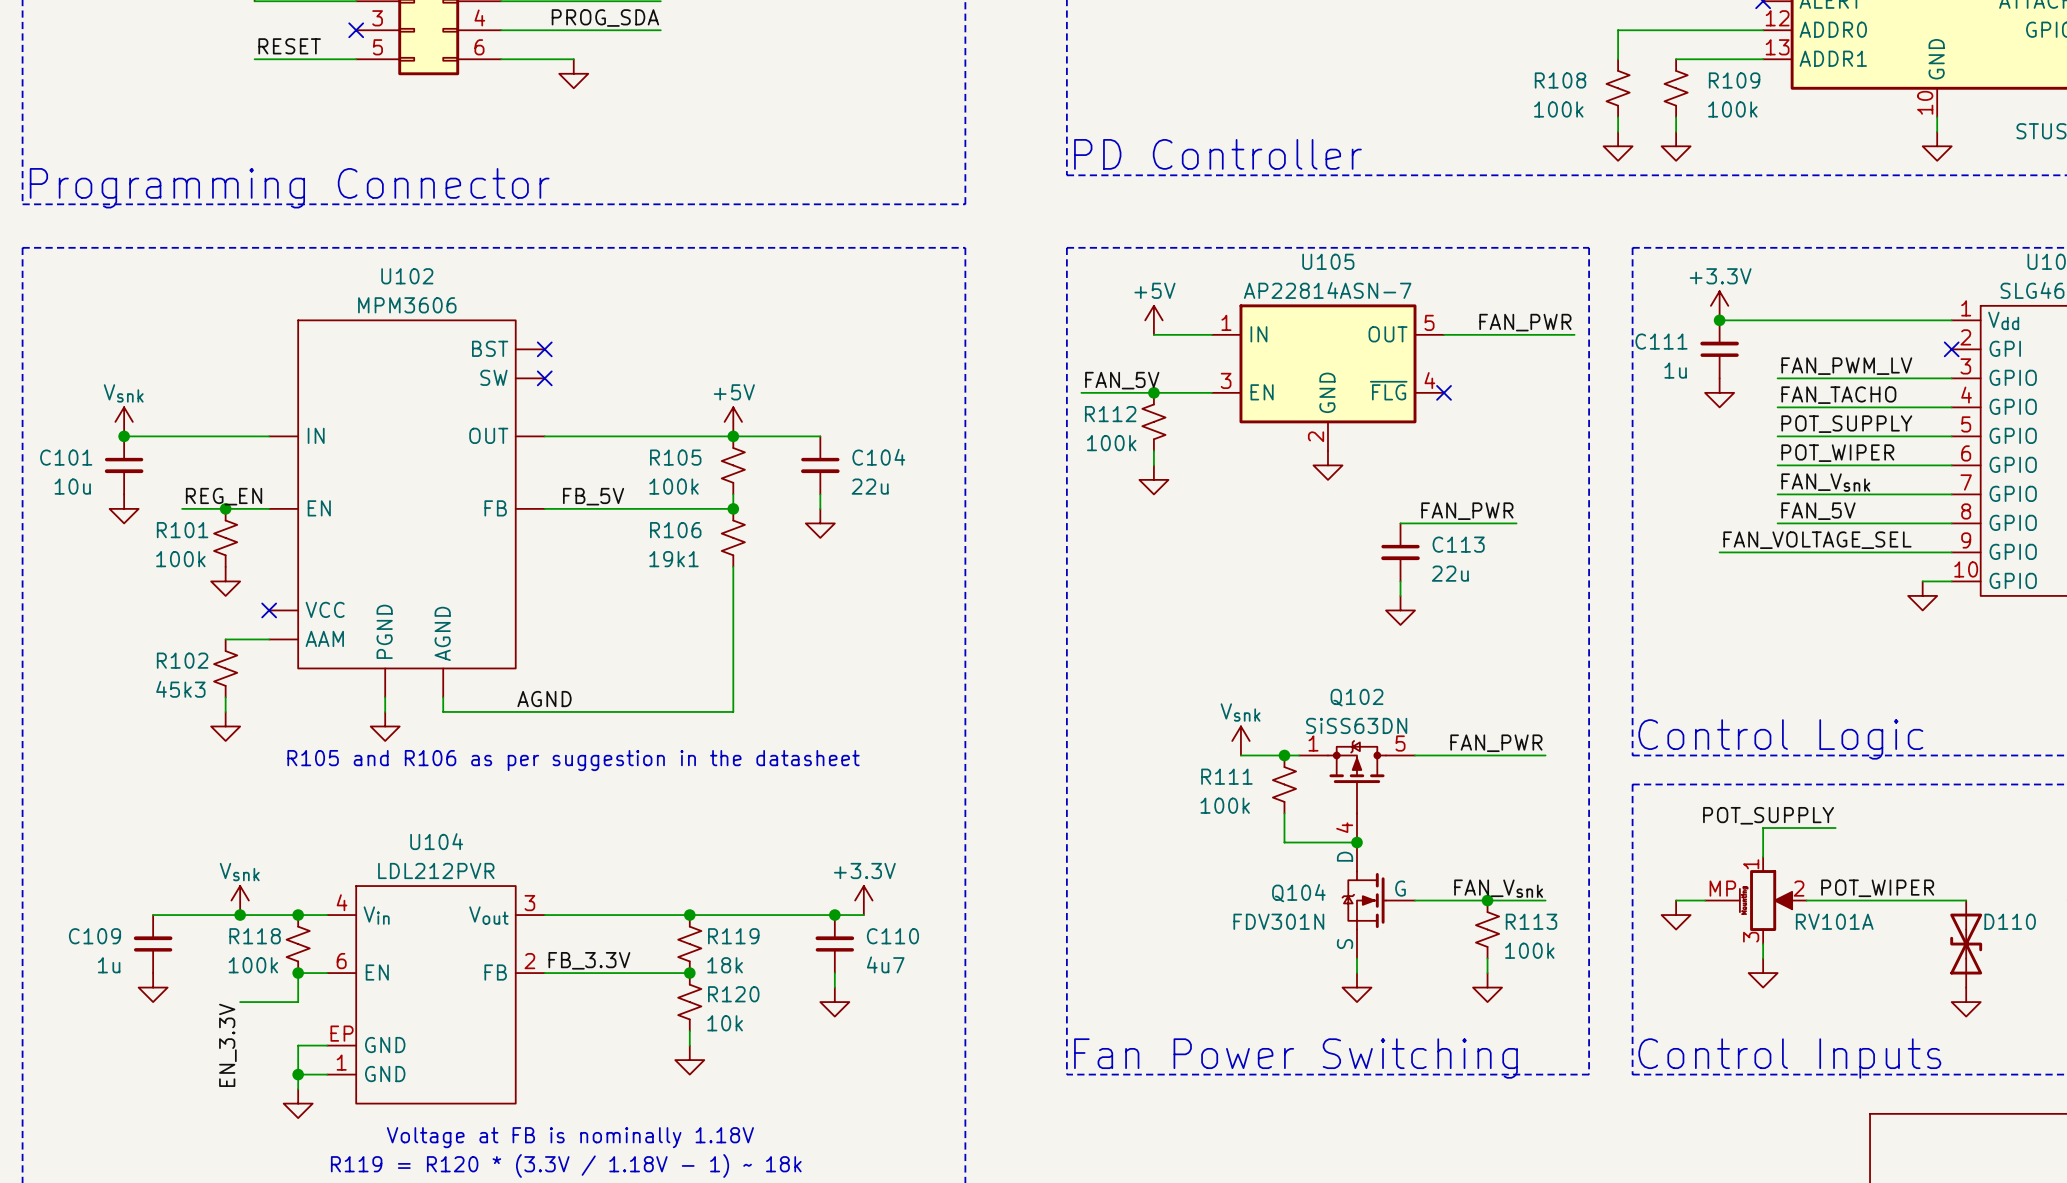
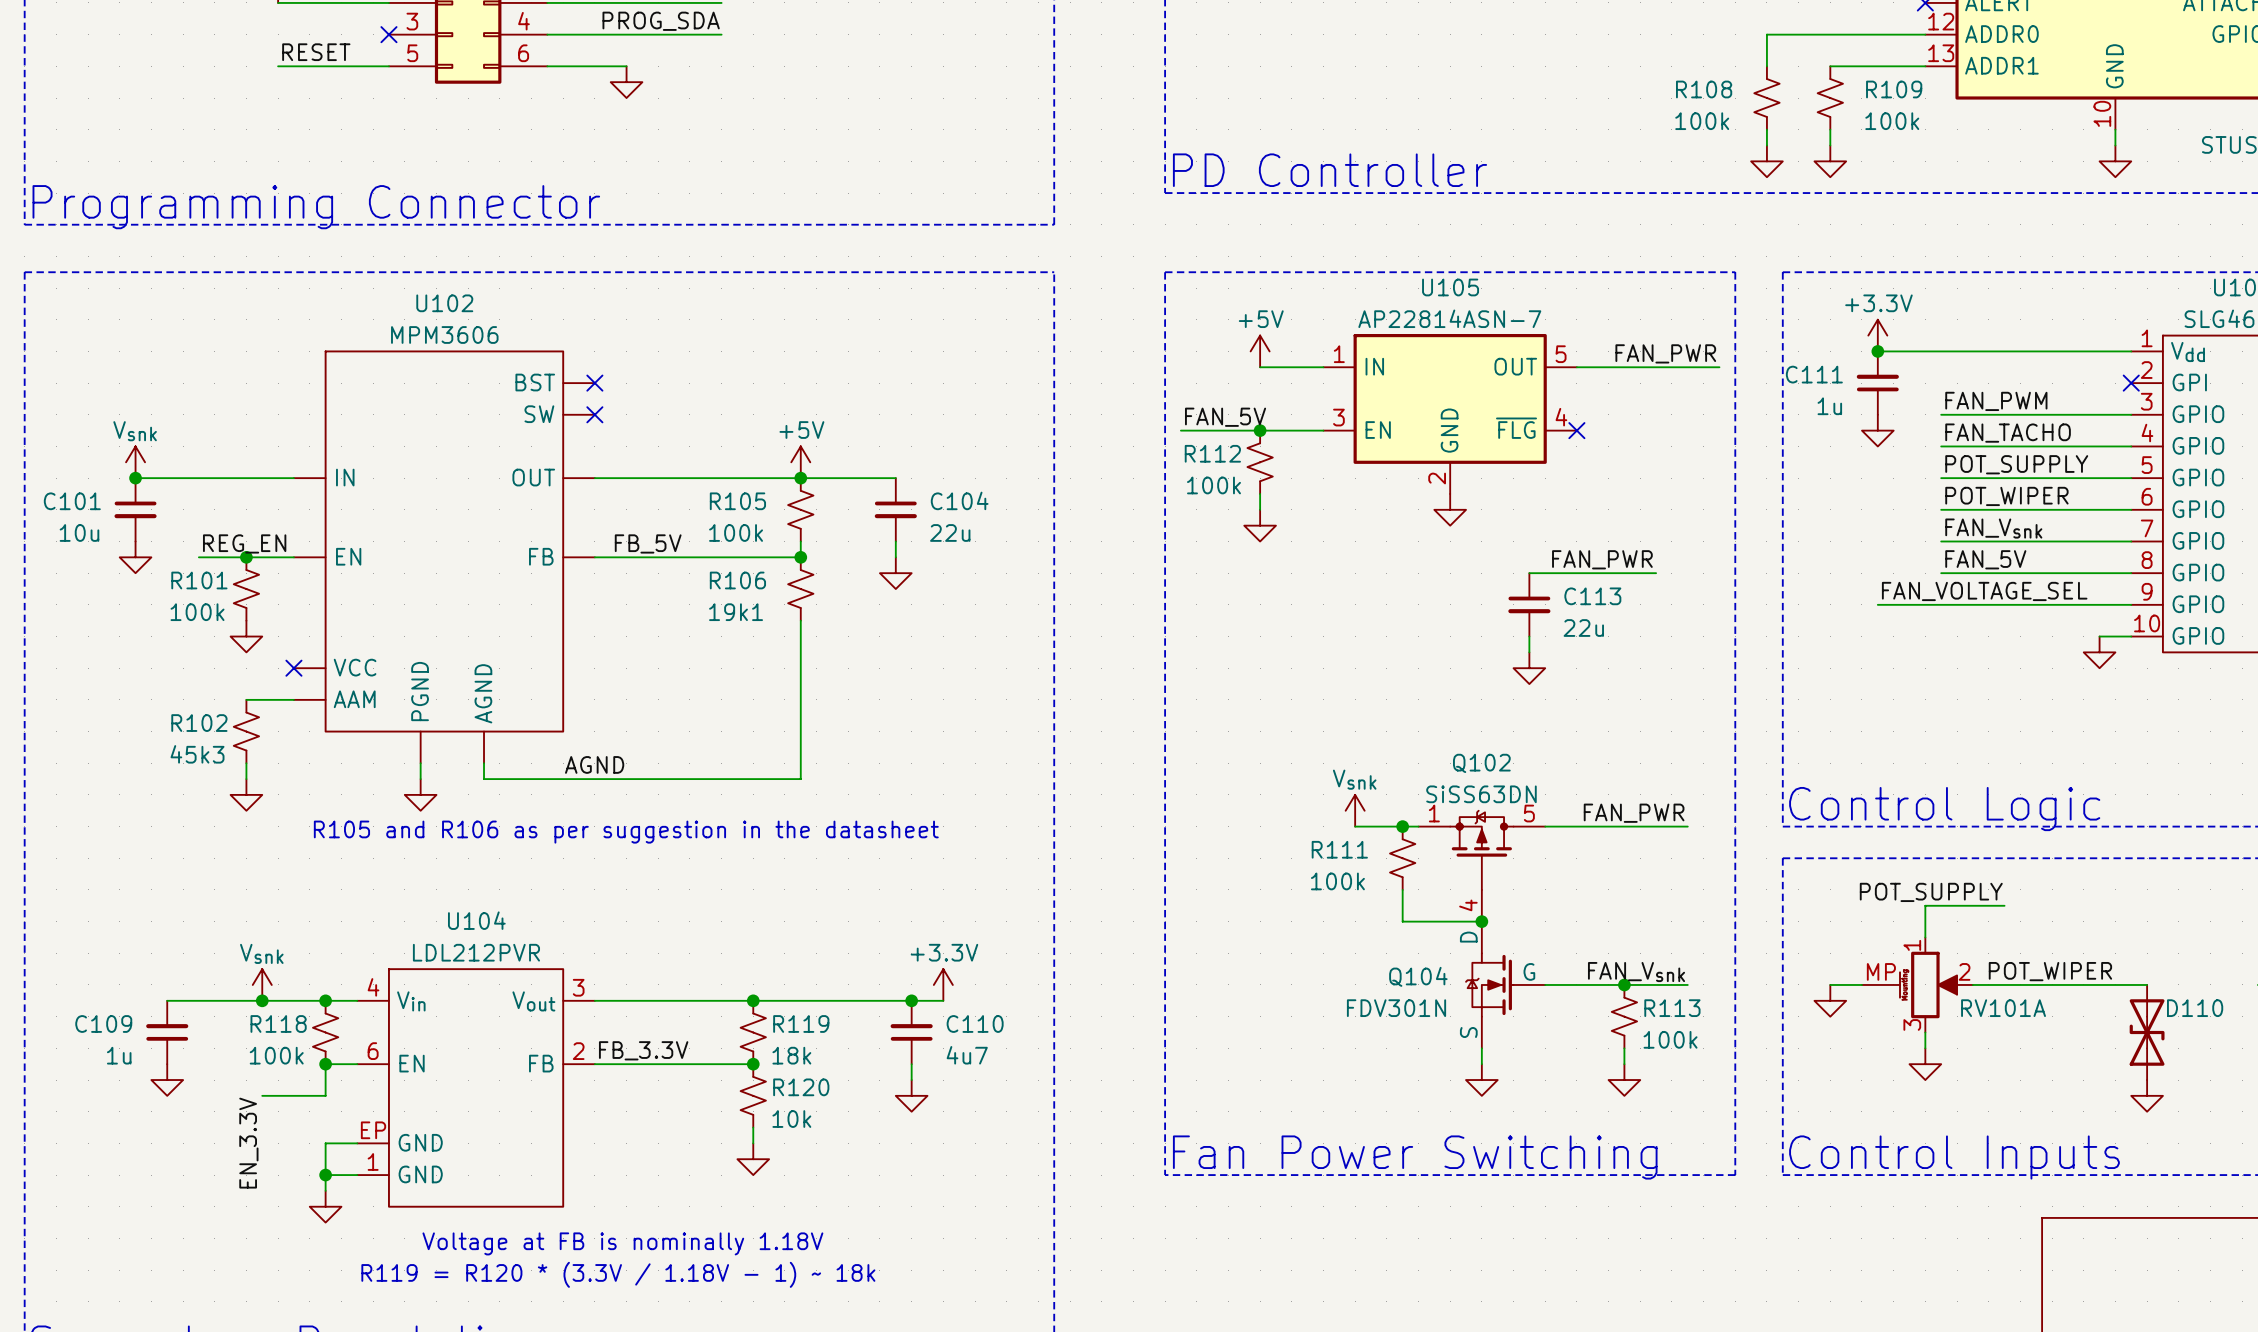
label: FAN_PWM_LV (1846, 366) -> FAN_PWM (1996, 401)

